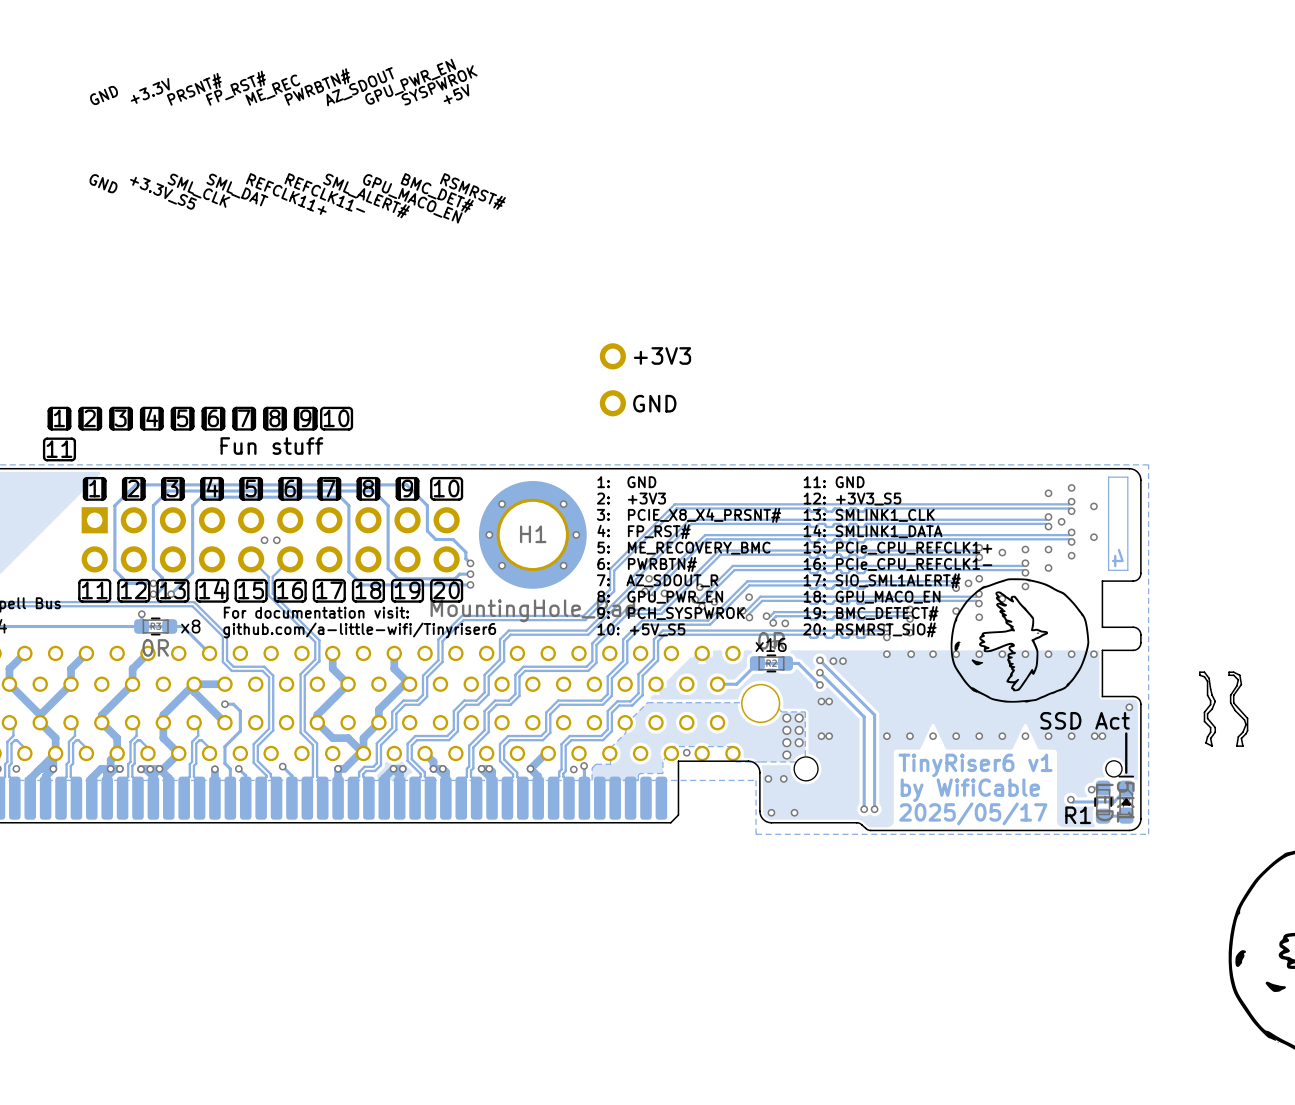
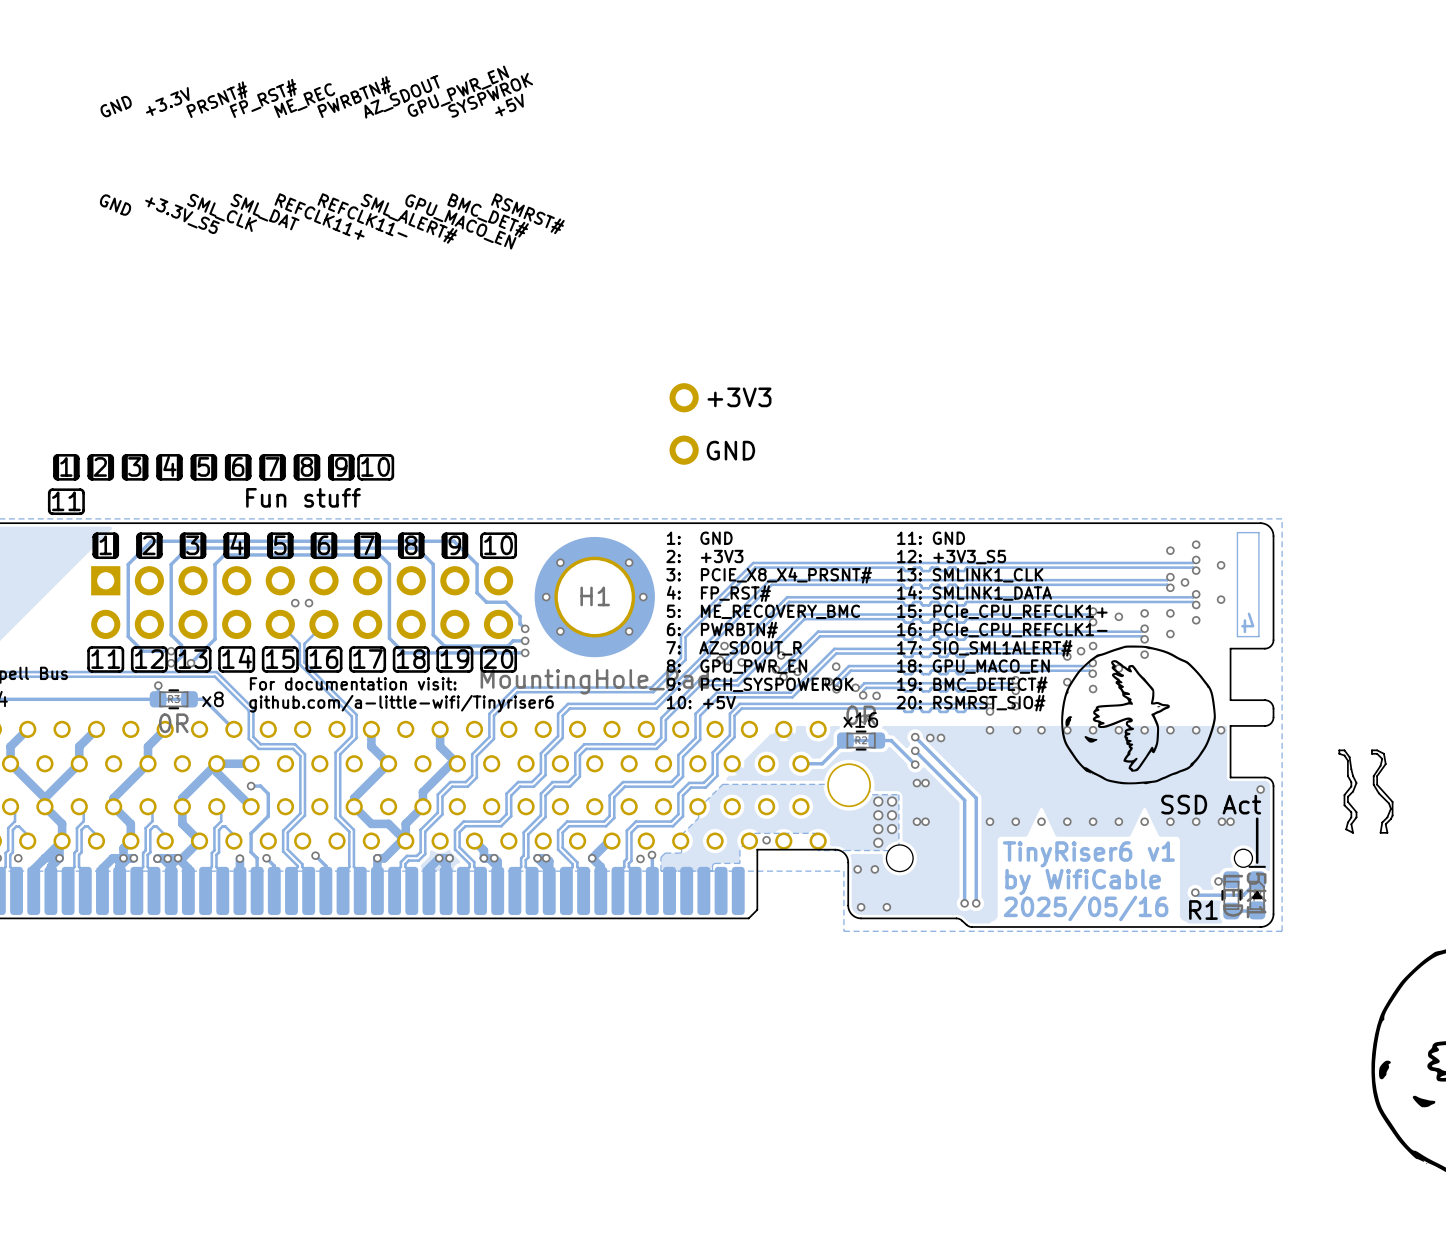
text: 9: PCH_SYSPWROK (671, 613) -> 9: PCH_SYSPOWEROK (760, 684)
text: 10: +5V_S5 (641, 629) -> 10: +5V (701, 702)
text: 2025/05/17 (973, 813) -> 2025/05/16 (1086, 908)

